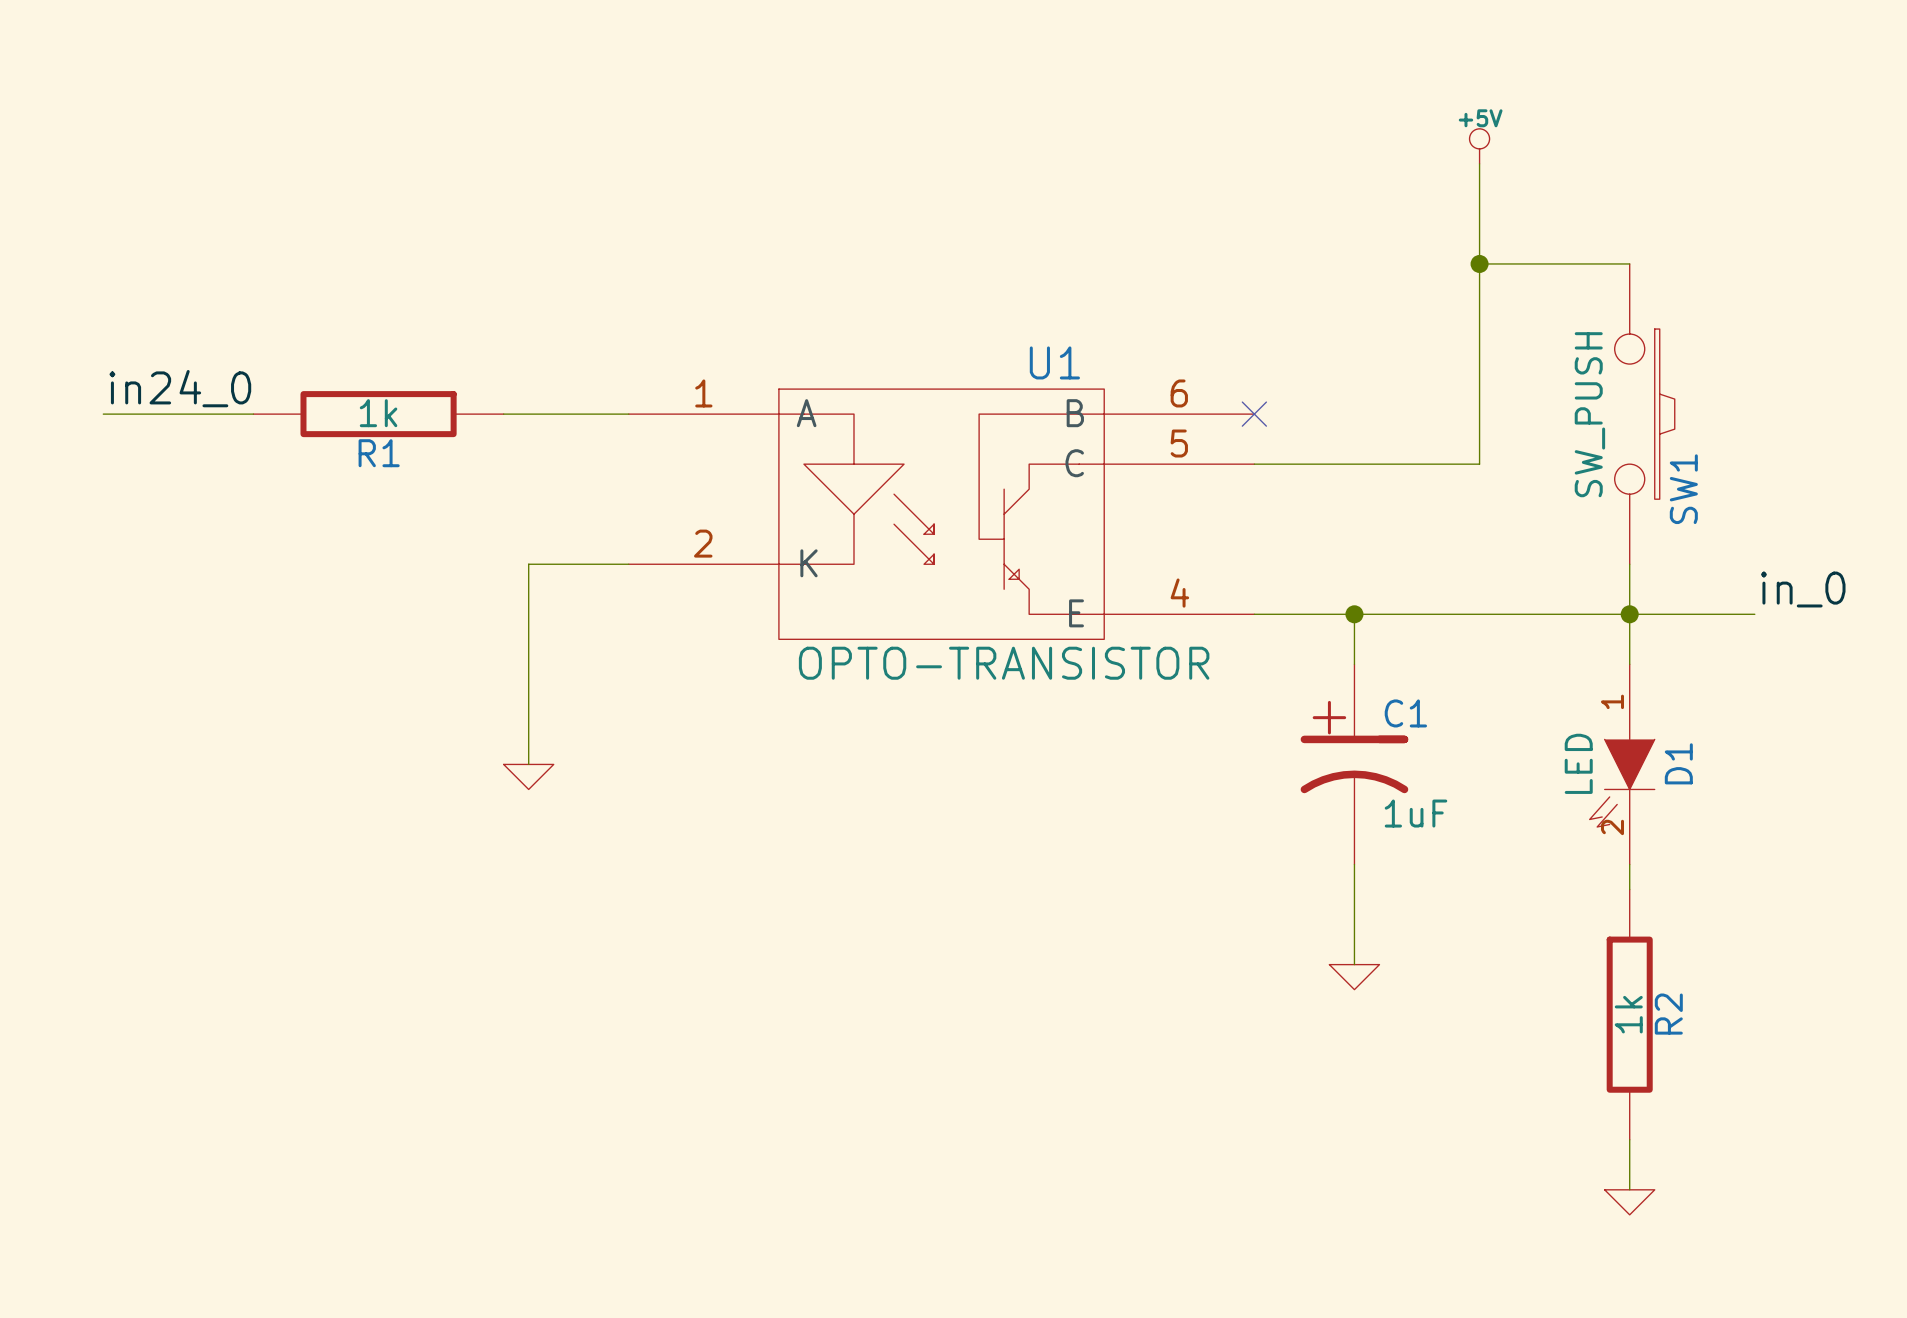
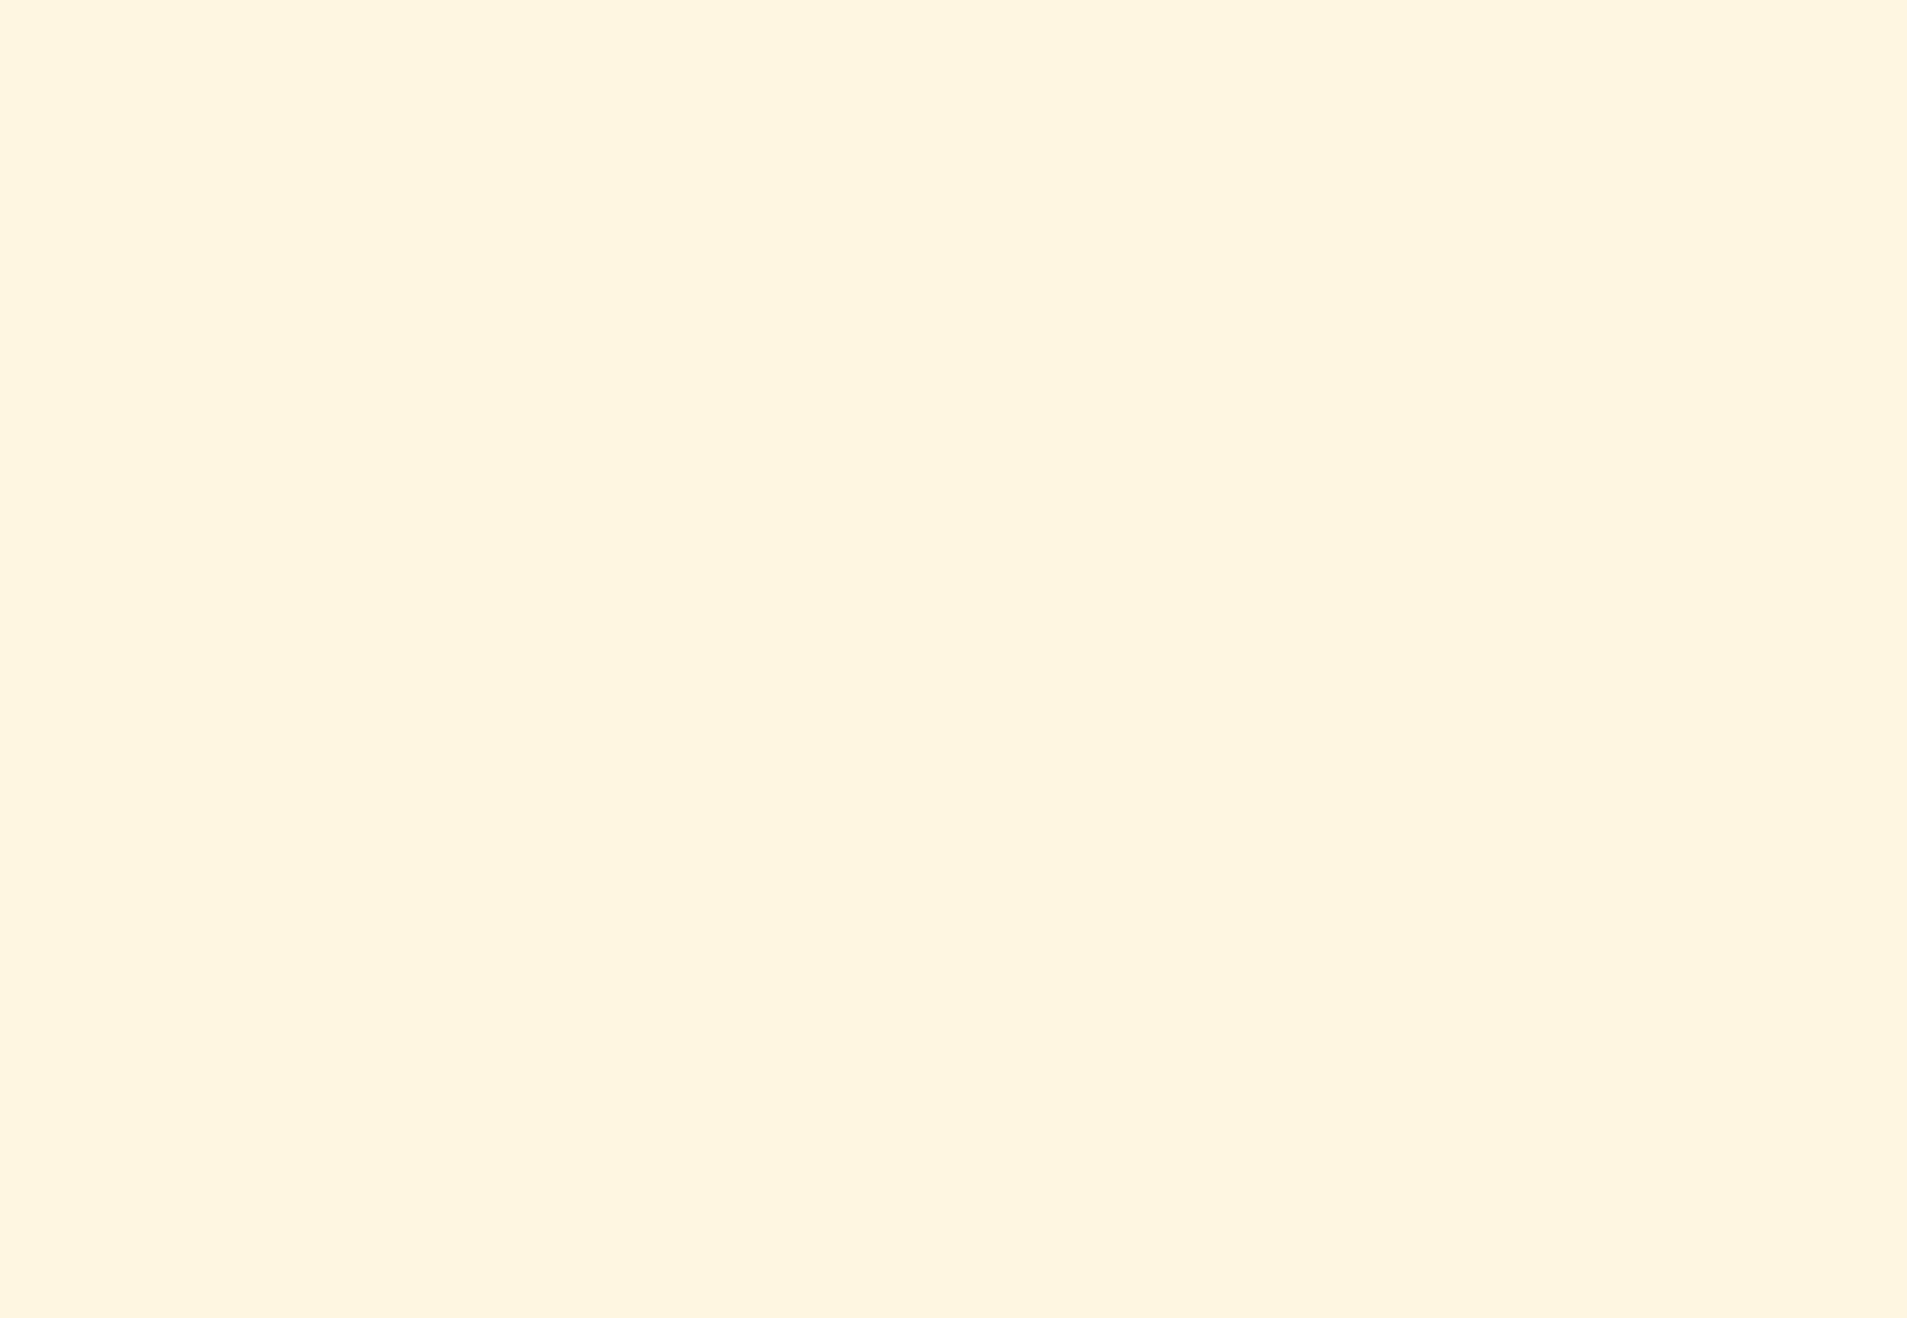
power symbol: +5V (1479, 146) -> none
wire: (1479, 163) (1479, 464) (1254, 464) -> none
wire: (1479, 263) (1629, 263) -> none
junction: (1479, 263) -> none
label: in24_0 (180, 388) -> none
wire: (103, 414) (253, 414) -> none
R1: 1k (378, 414) -> none
wire: (503, 414) (628, 414) -> none
no-connect mark: (1254, 414) -> none
SW1: SW_PUSH (1644, 414) -> none
U1: OPTO-TRANSISTOR (941, 514) -> none
wire: (628, 564) (528, 564) (528, 764) -> none
wire: (1629, 564) (1629, 664) -> none
label: in_0 (1803, 589) -> none
wire: (1254, 614) (1754, 614) -> none
wire: (1354, 614) (1354, 664) -> none
junction: (1354, 614) -> none
junction: (1629, 614) -> none
C1: 1uF (1354, 764) -> none
D1: LED (1622, 764) -> none
power symbol: (528, 776) -> none
wire: (1354, 864) (1354, 964) -> none
wire: (1629, 864) (1629, 889) -> none
power symbol: (1354, 977) -> none
R2: 1k (1629, 1014) -> none
wire: (1629, 1139) (1629, 1189) -> none
power symbol: (1629, 1202) -> none

